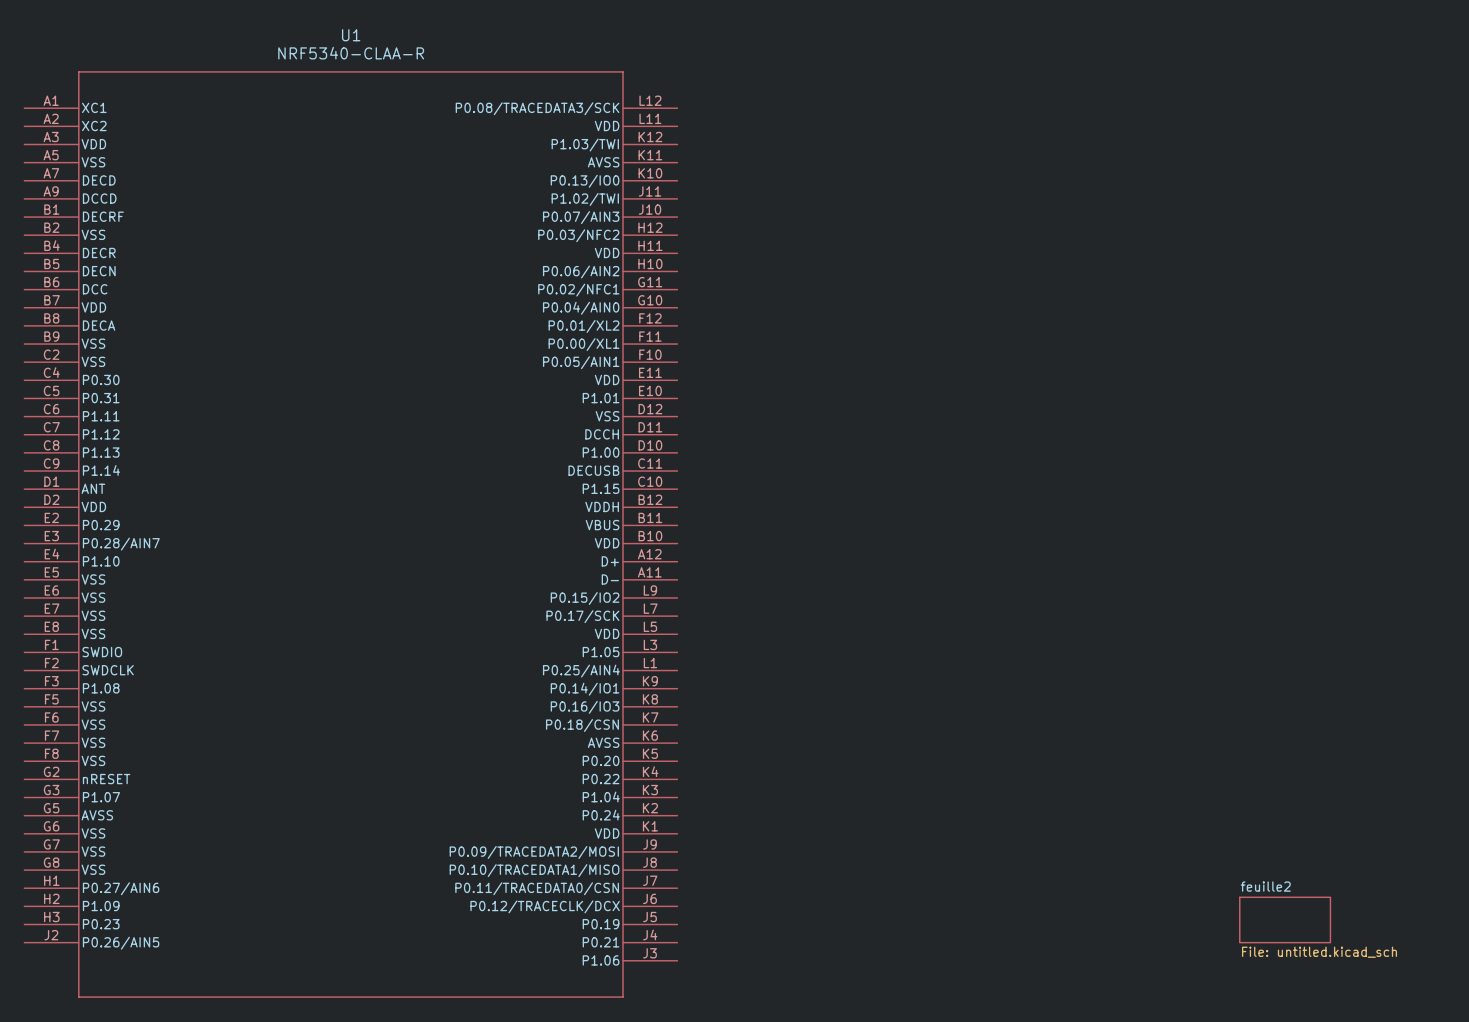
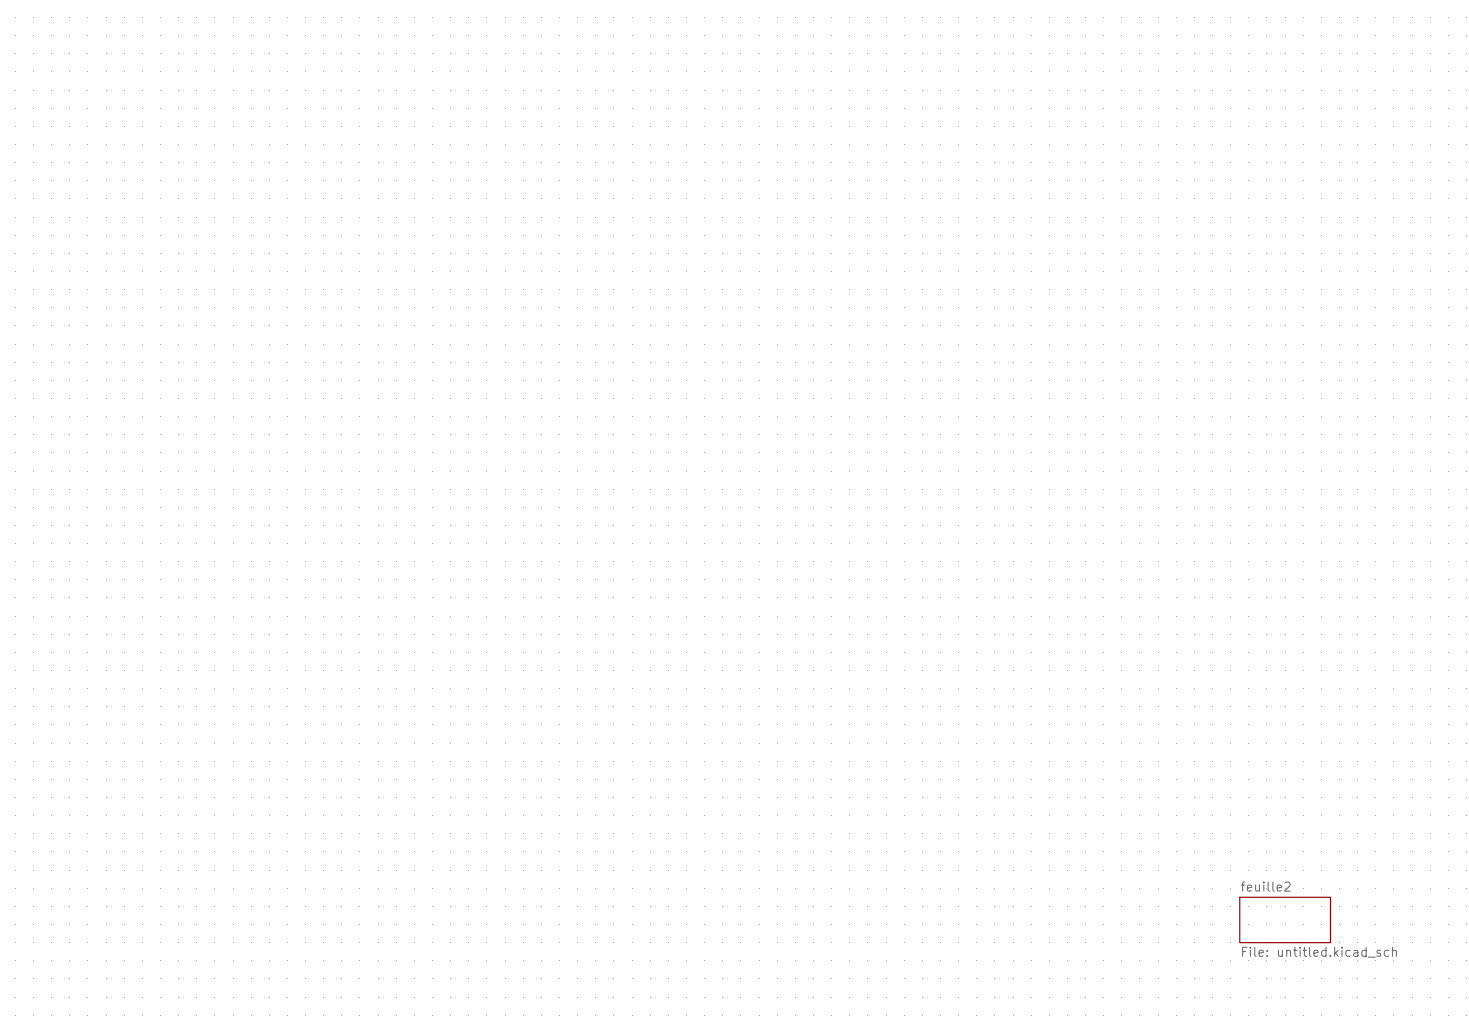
U1: NRF5340-CLAA-R (350, 534) -> none

